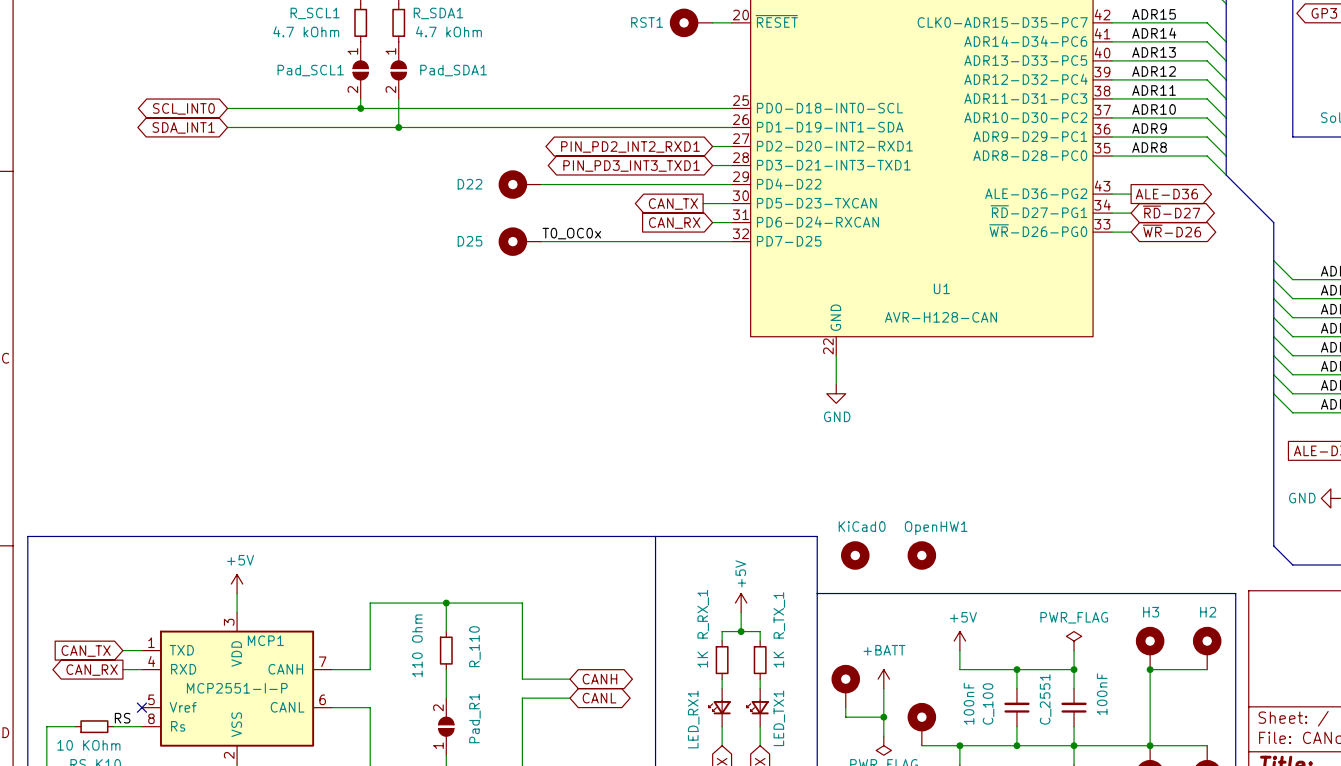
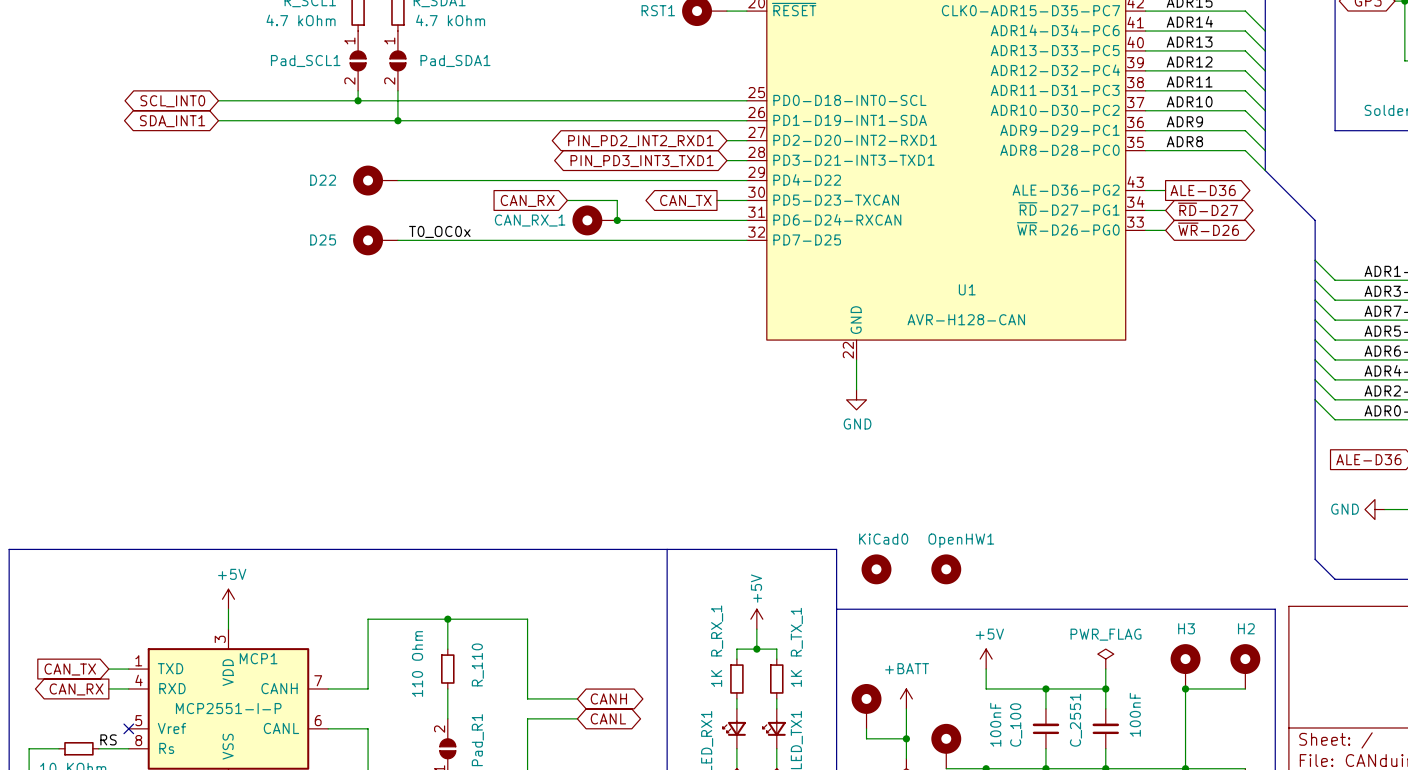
wire: none -> (397, 180) (547, 180)
D22 position: (520, 184) -> (375, 180)
wire: none -> (567, 200) (617, 200) (617, 220) (726, 220)
CAN_RX_1: none -> (594, 220)
junction: none -> (617, 220)
global label position: CAN_RX (674, 223) -> CAN_RX (527, 200)
label position: T0_OC0x (571, 233) -> T0_OC0x (439, 231)
wire: none -> (397, 240) (547, 240)
D25 position: (520, 241) -> (375, 240)

